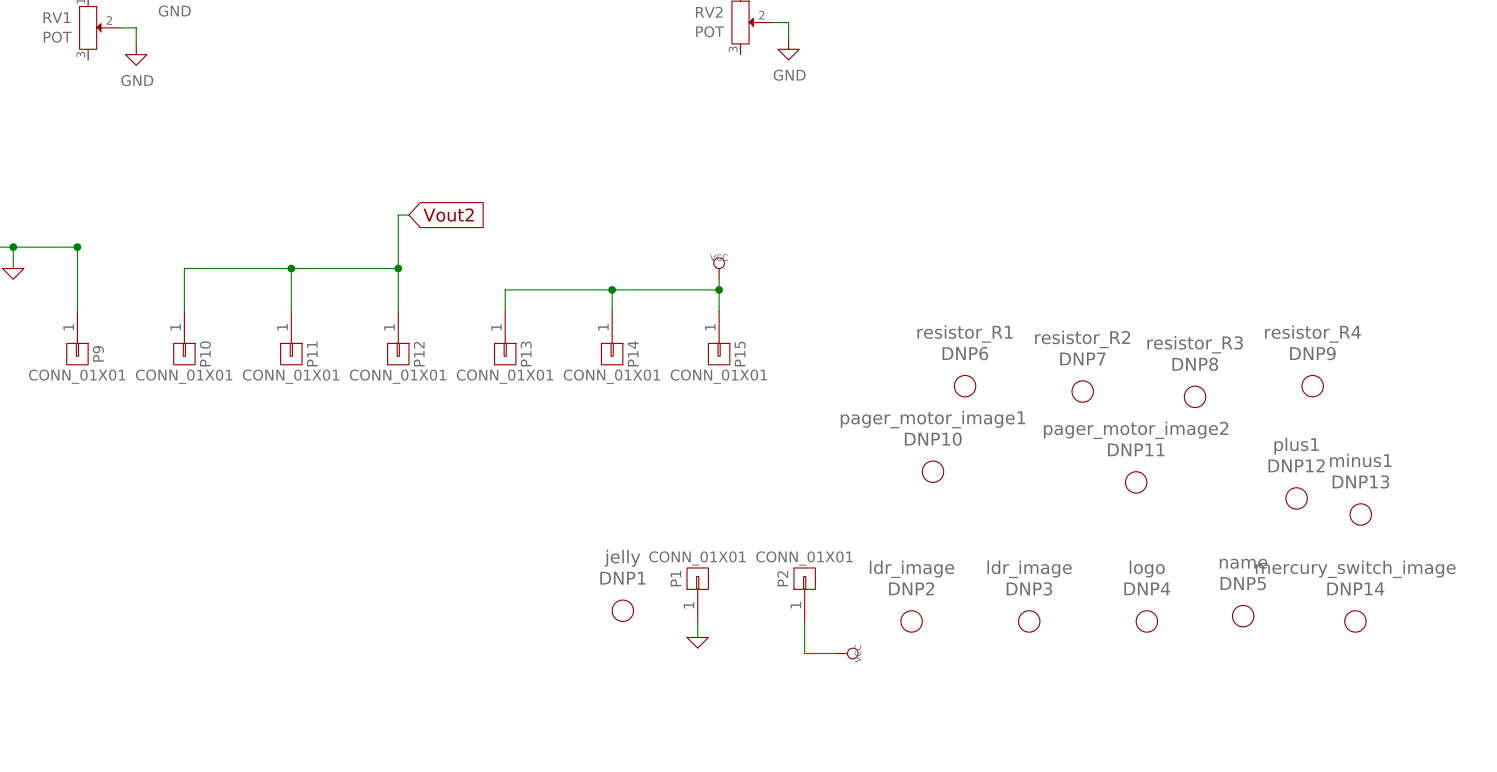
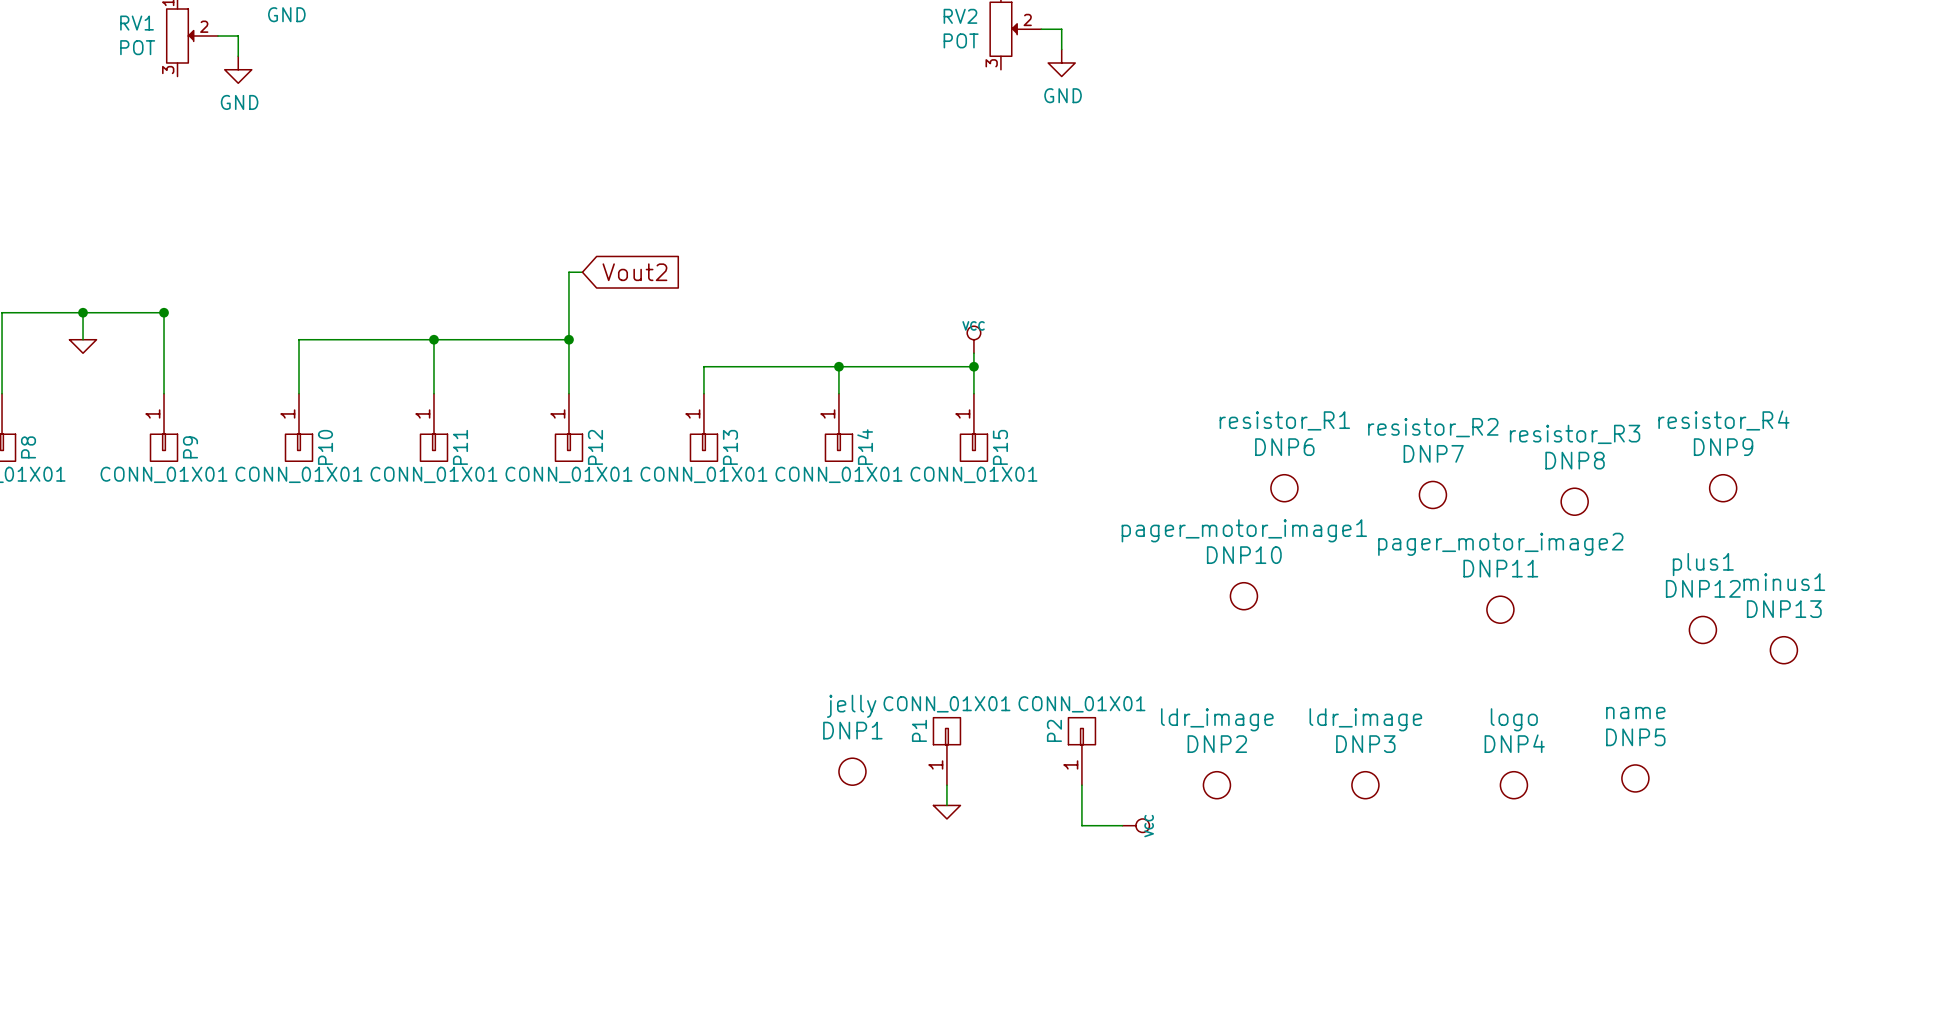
DNP14: mercury_switch_image (1355, 621) -> none

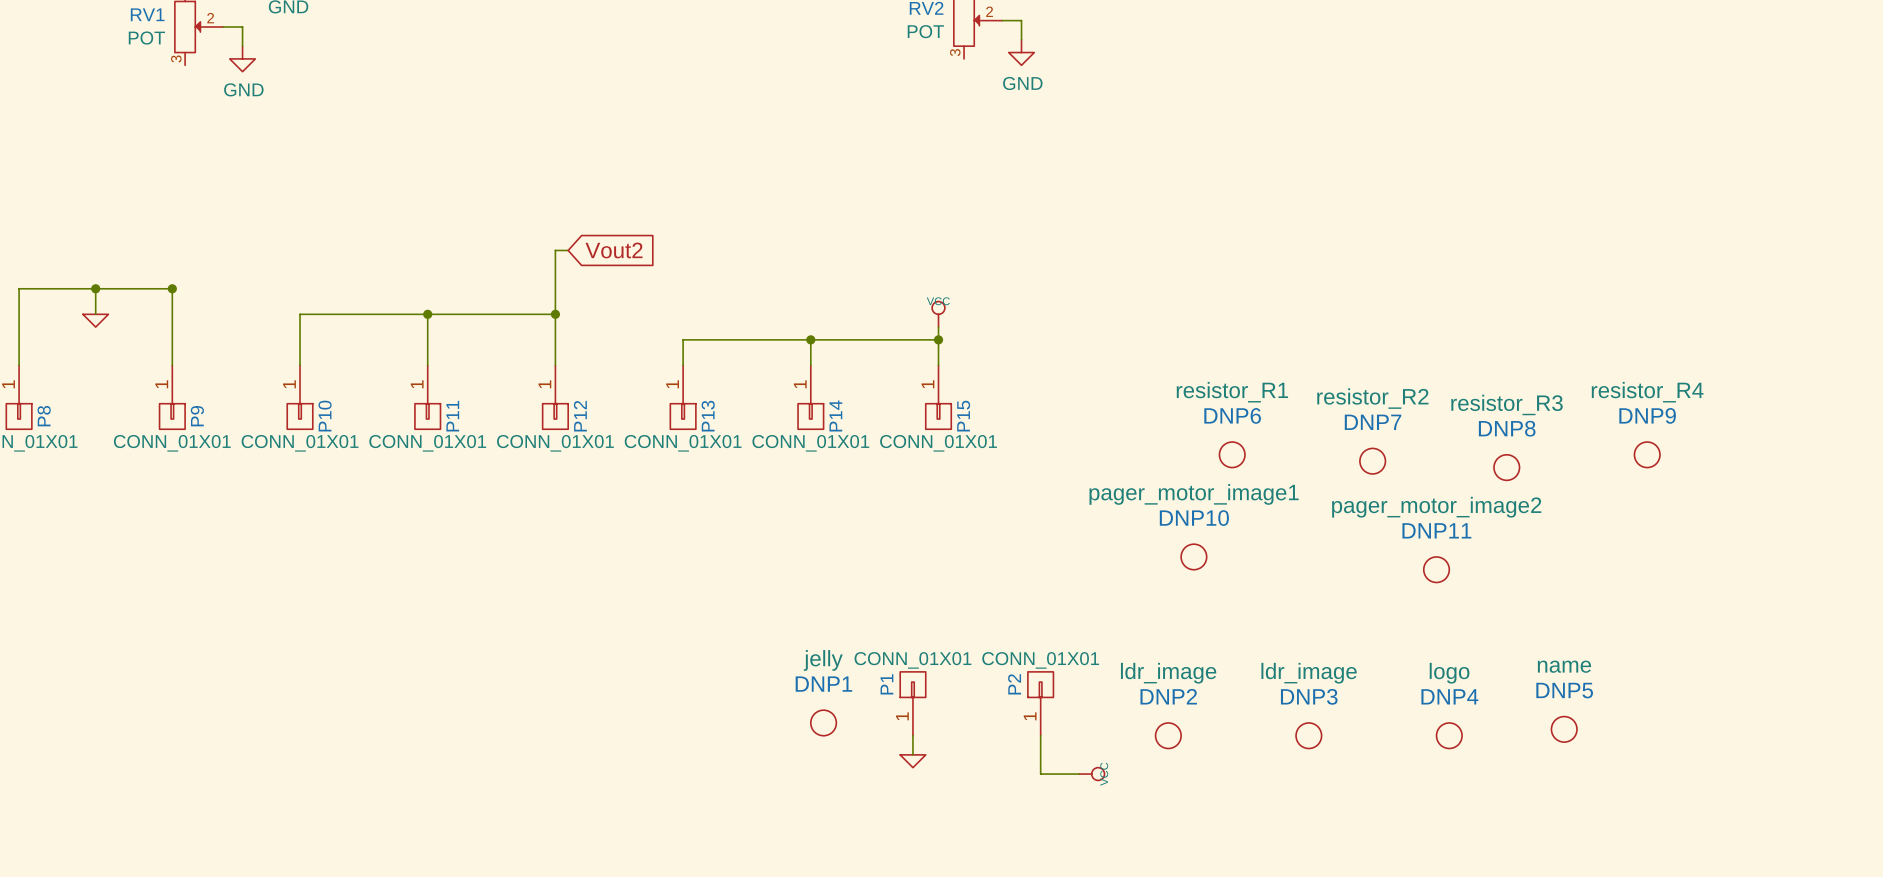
DNP12: plus1 (1702, 629) -> none
DNP13: minus1 (1783, 650) -> none

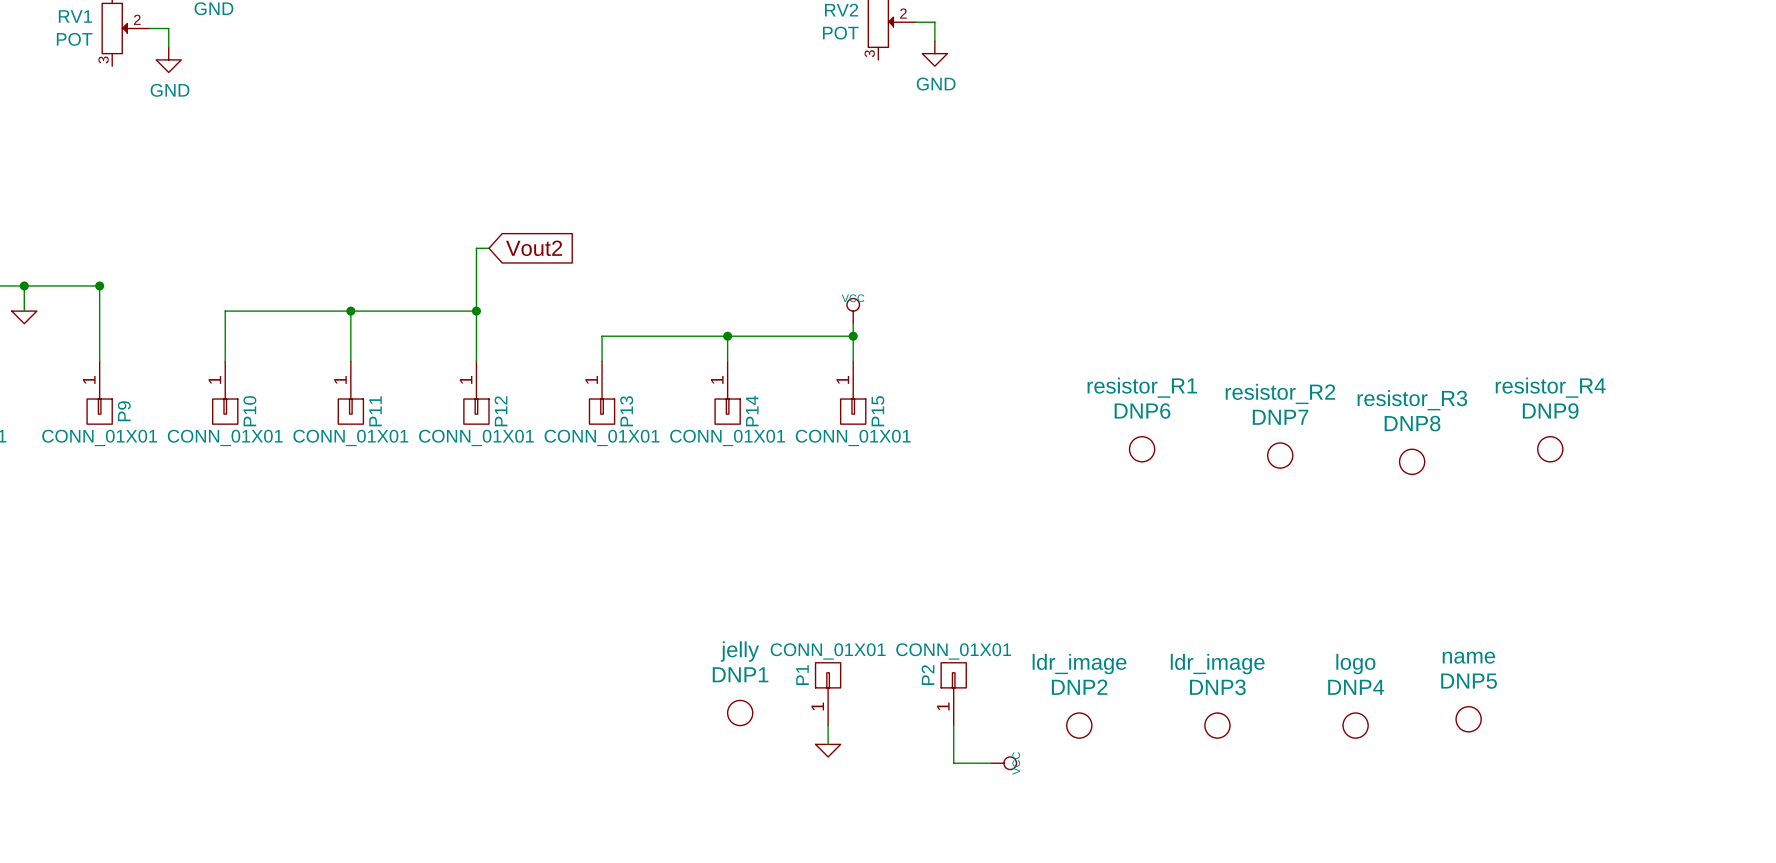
DNP10: pager_motor_image1 (1193, 556) -> none
DNP11: pager_motor_image2 (1436, 569) -> none

